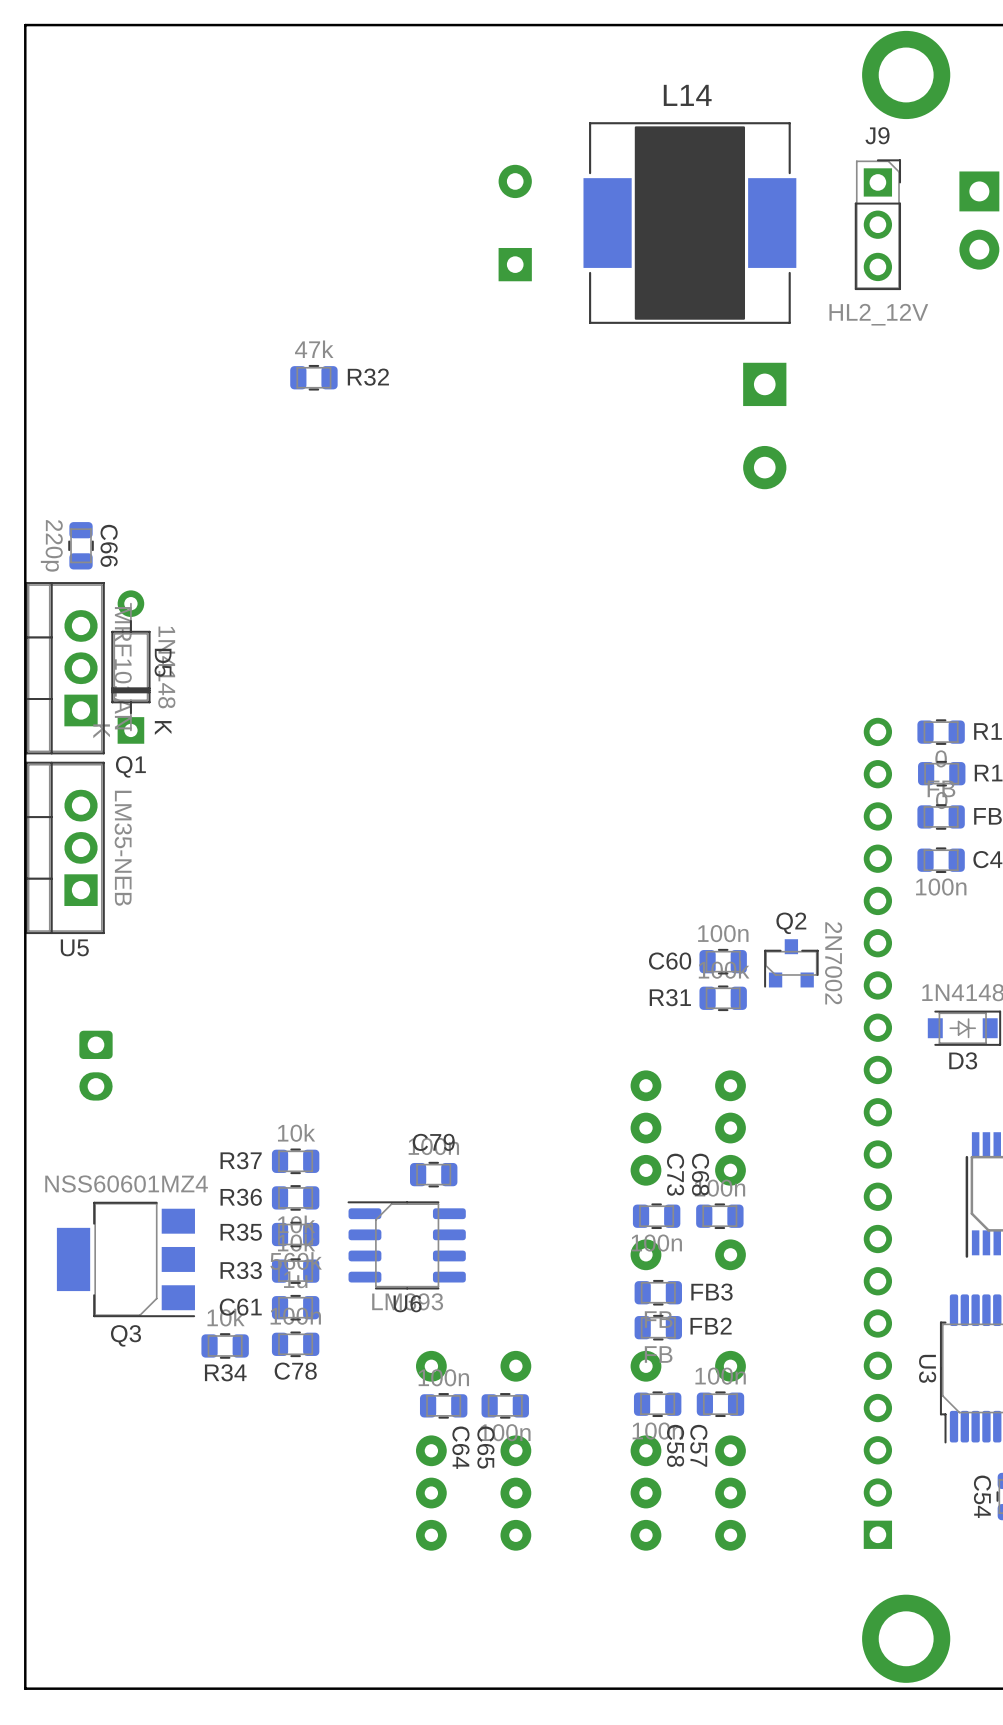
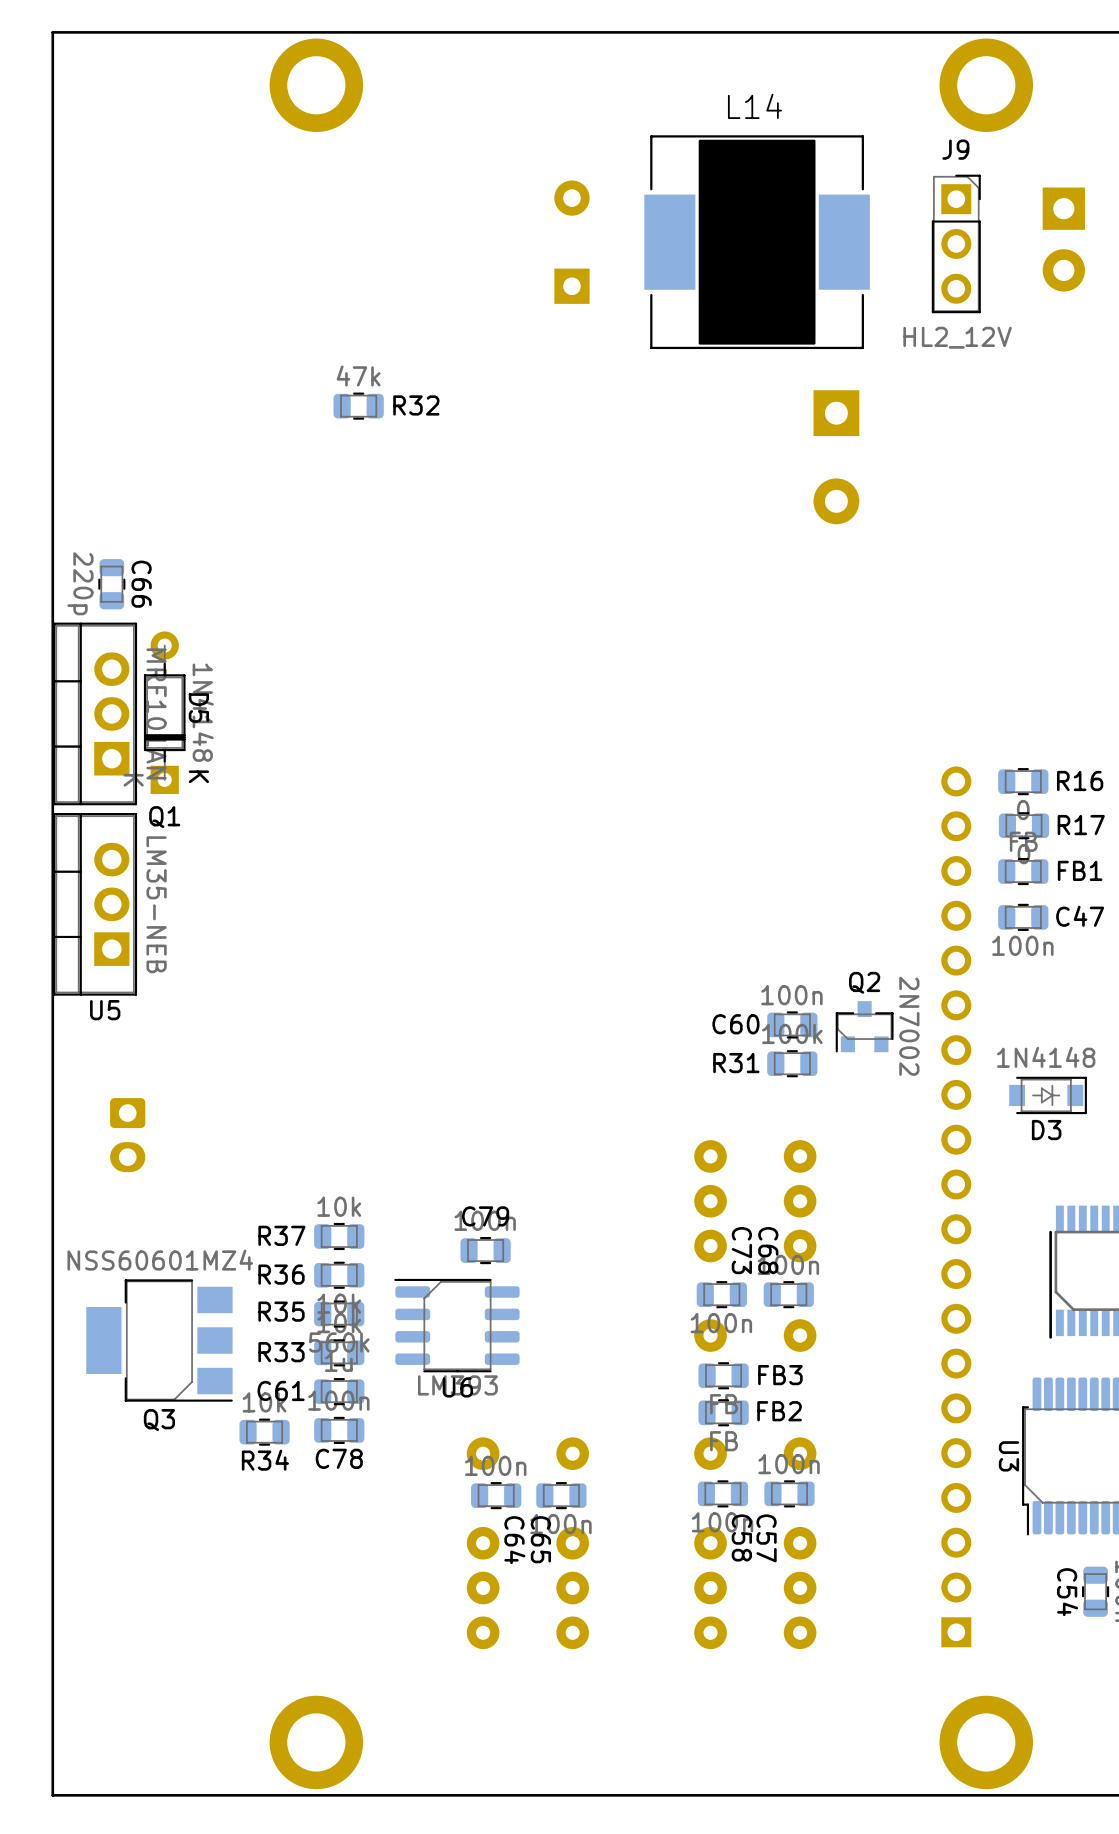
part: none -> (316, 85)
part: none -> (316, 1742)

